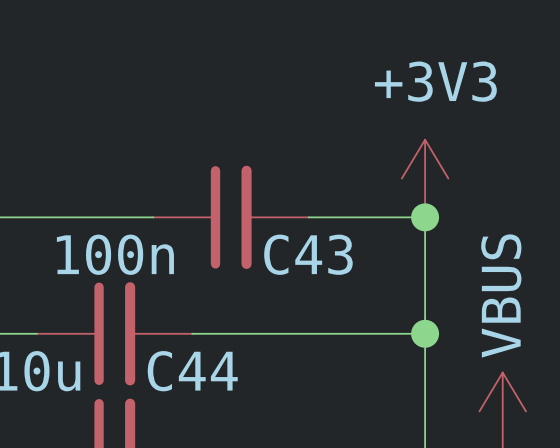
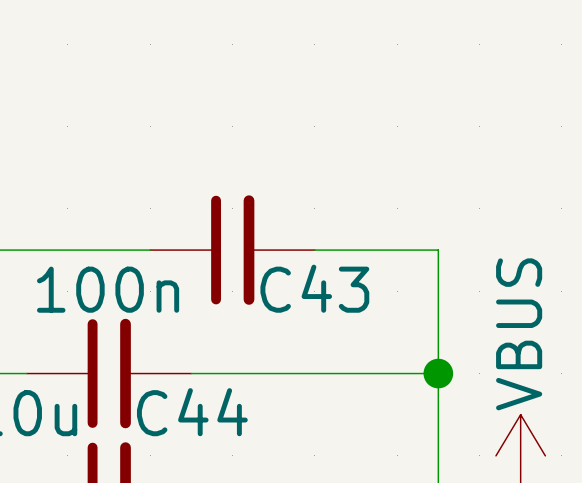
power symbol: +3V3 (425, 178) -> none
junction: (425, 217) -> none

